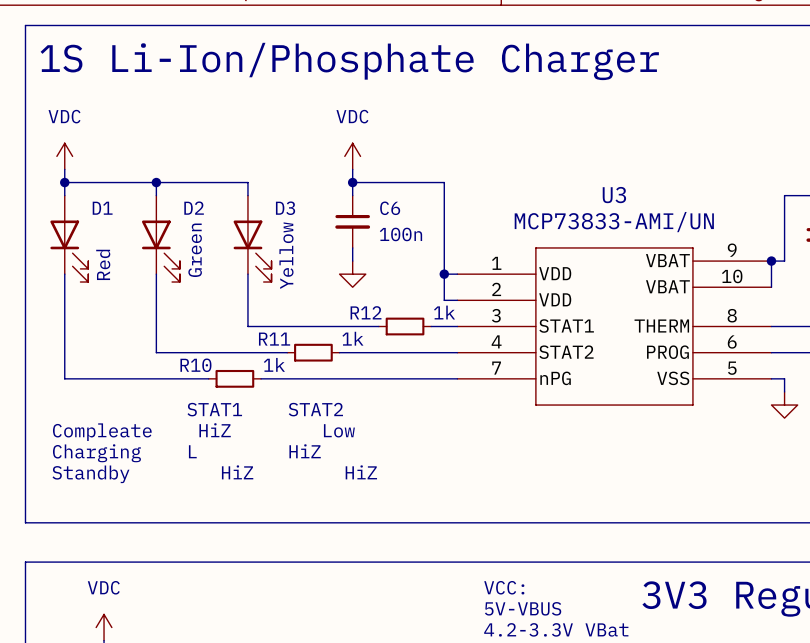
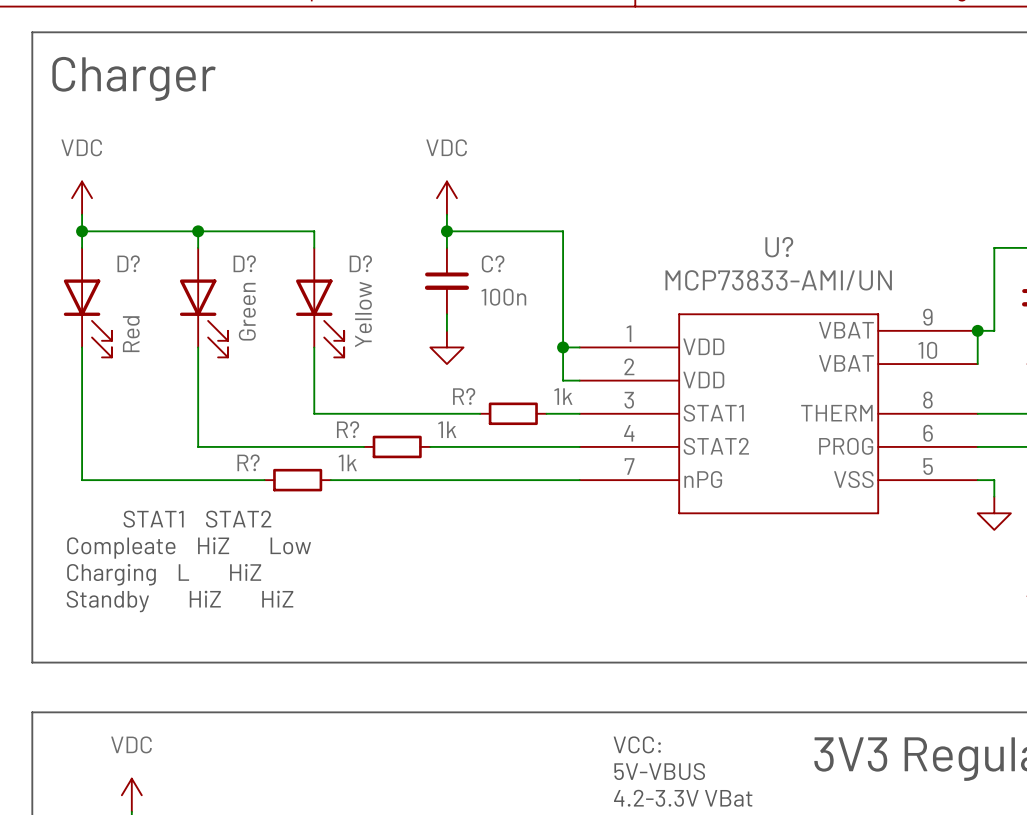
text: 1S Li-Ion/Phosphate Charger (349, 61) -> Charger (134, 78)
U3 name: U3 (614, 195) -> U? (779, 247)
D1 name: D1 (102, 208) -> D? (128, 263)
D2 name: D2 (194, 208) -> D? (244, 263)
D3 name: D3 (285, 208) -> D? (360, 263)
C6 name: C6 (390, 208) -> C? (493, 263)
R12 name: R12 (366, 312) -> R? (464, 396)
R11 name: R11 (274, 339) -> R? (348, 429)
R10 name: R10 (195, 365) -> R? (248, 462)

